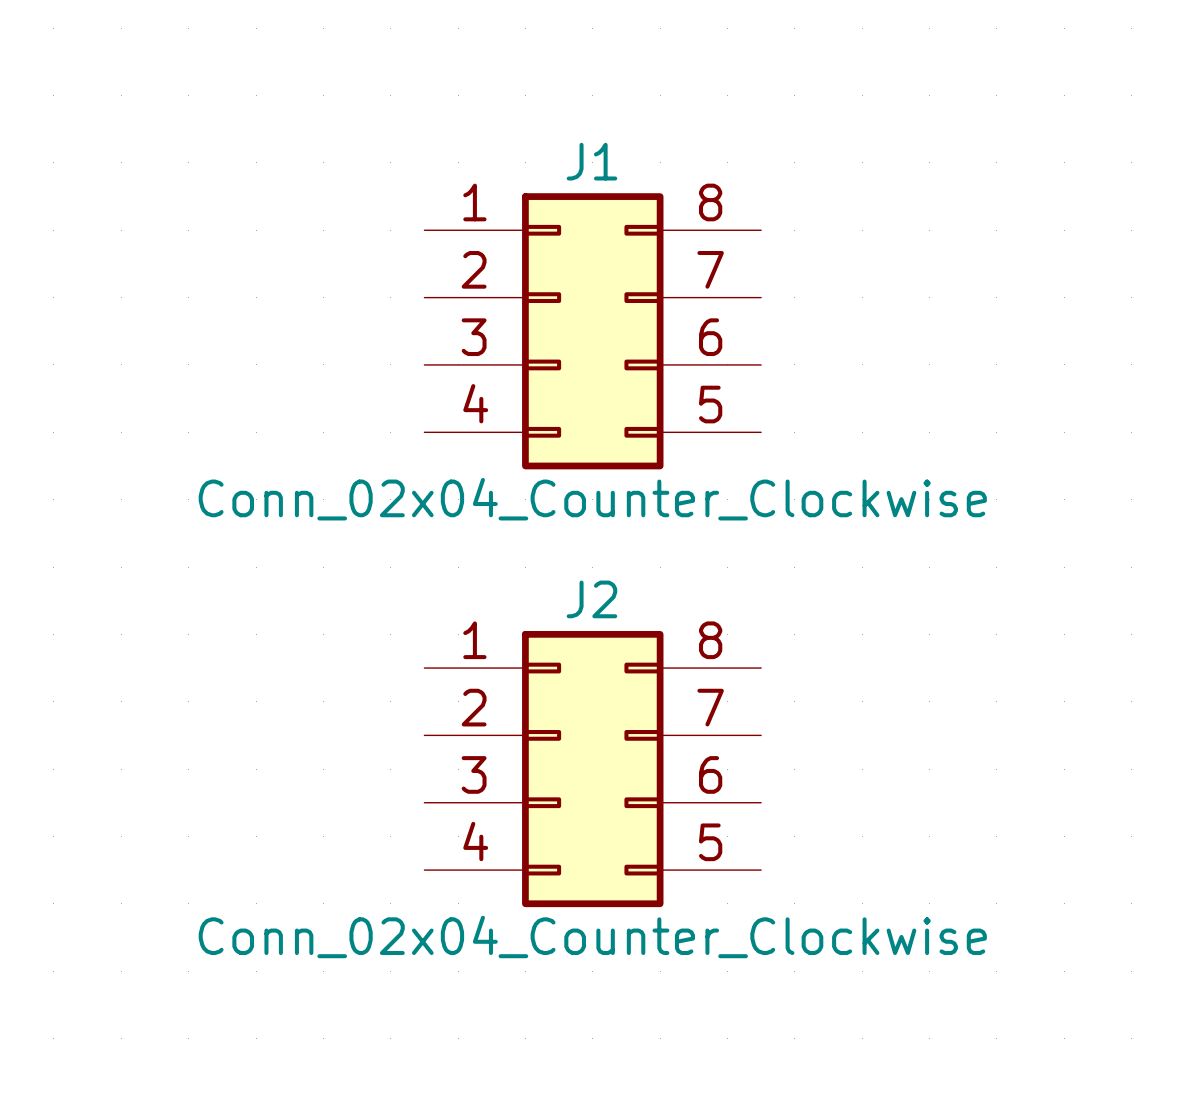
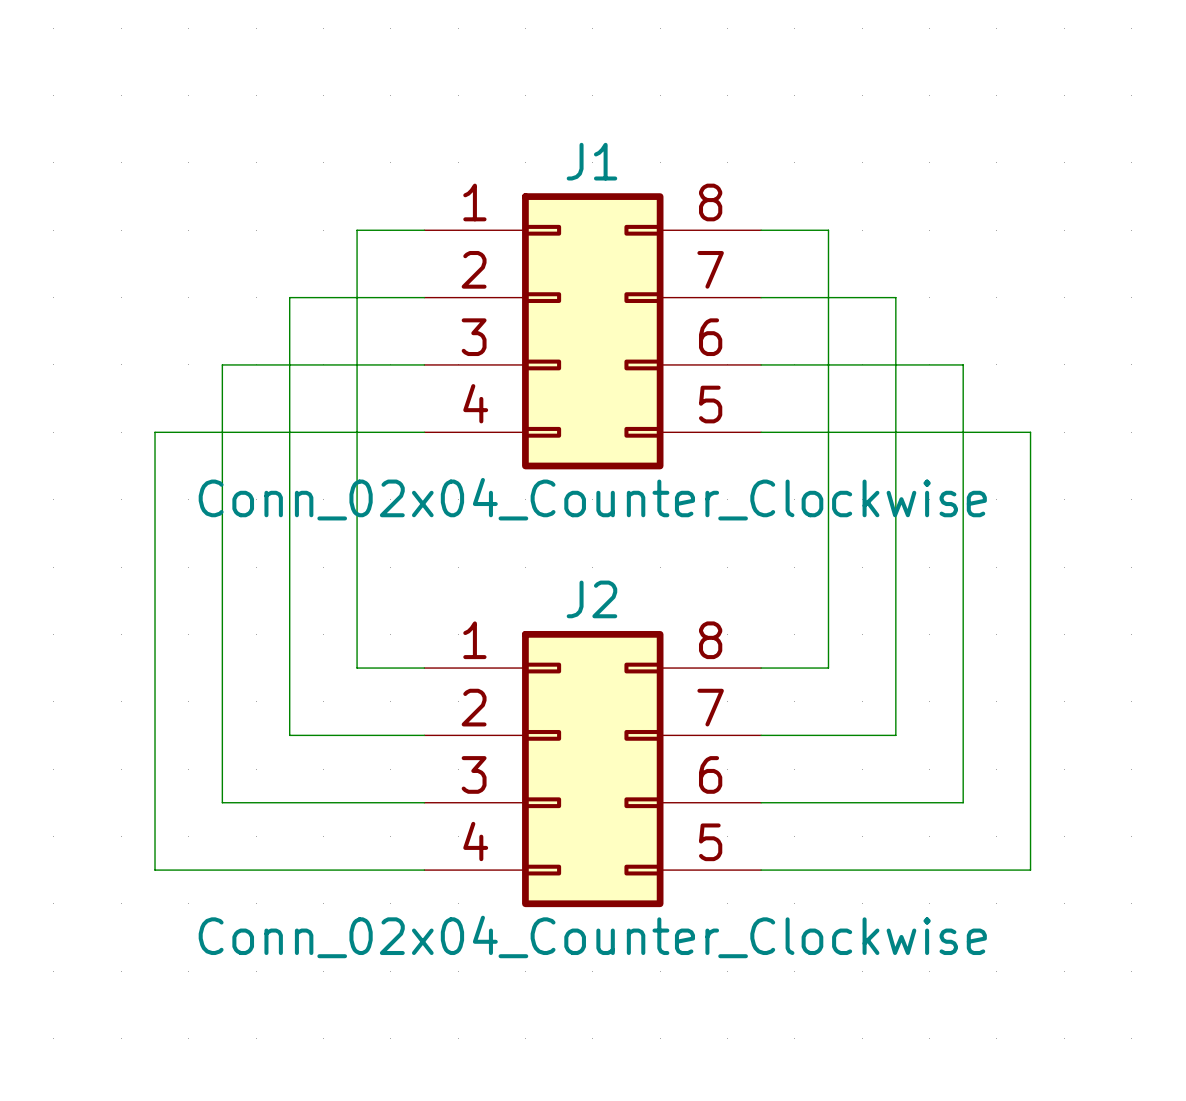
wire: none -> (424, 230) (357, 230) (357, 668) (424, 668)
wire: none -> (761, 230) (828, 230) (828, 668) (761, 668)
wire: none -> (424, 297) (289, 297) (289, 735) (424, 735)
wire: none -> (761, 297) (895, 297) (895, 735) (761, 735)
wire: none -> (424, 364) (222, 364) (222, 802) (424, 802)
wire: none -> (761, 364) (963, 364) (963, 802) (761, 802)
wire: none -> (424, 432) (155, 432) (155, 870) (424, 870)
wire: none -> (761, 432) (1030, 432) (1030, 870) (761, 870)

